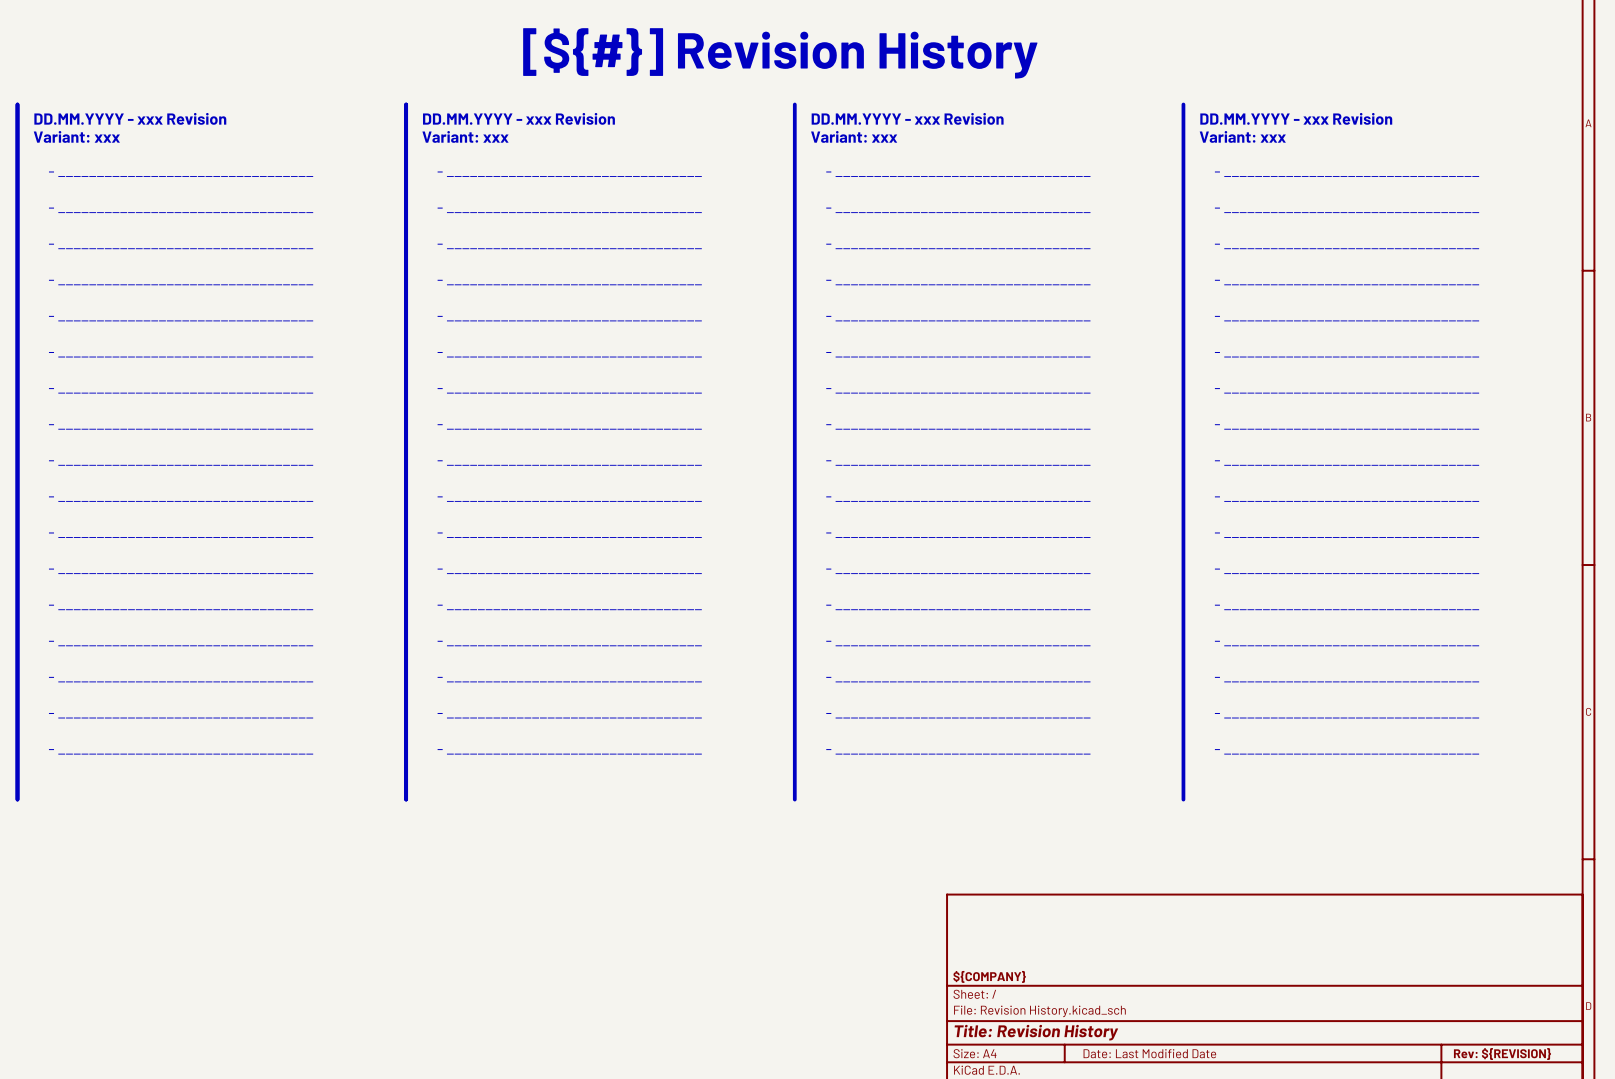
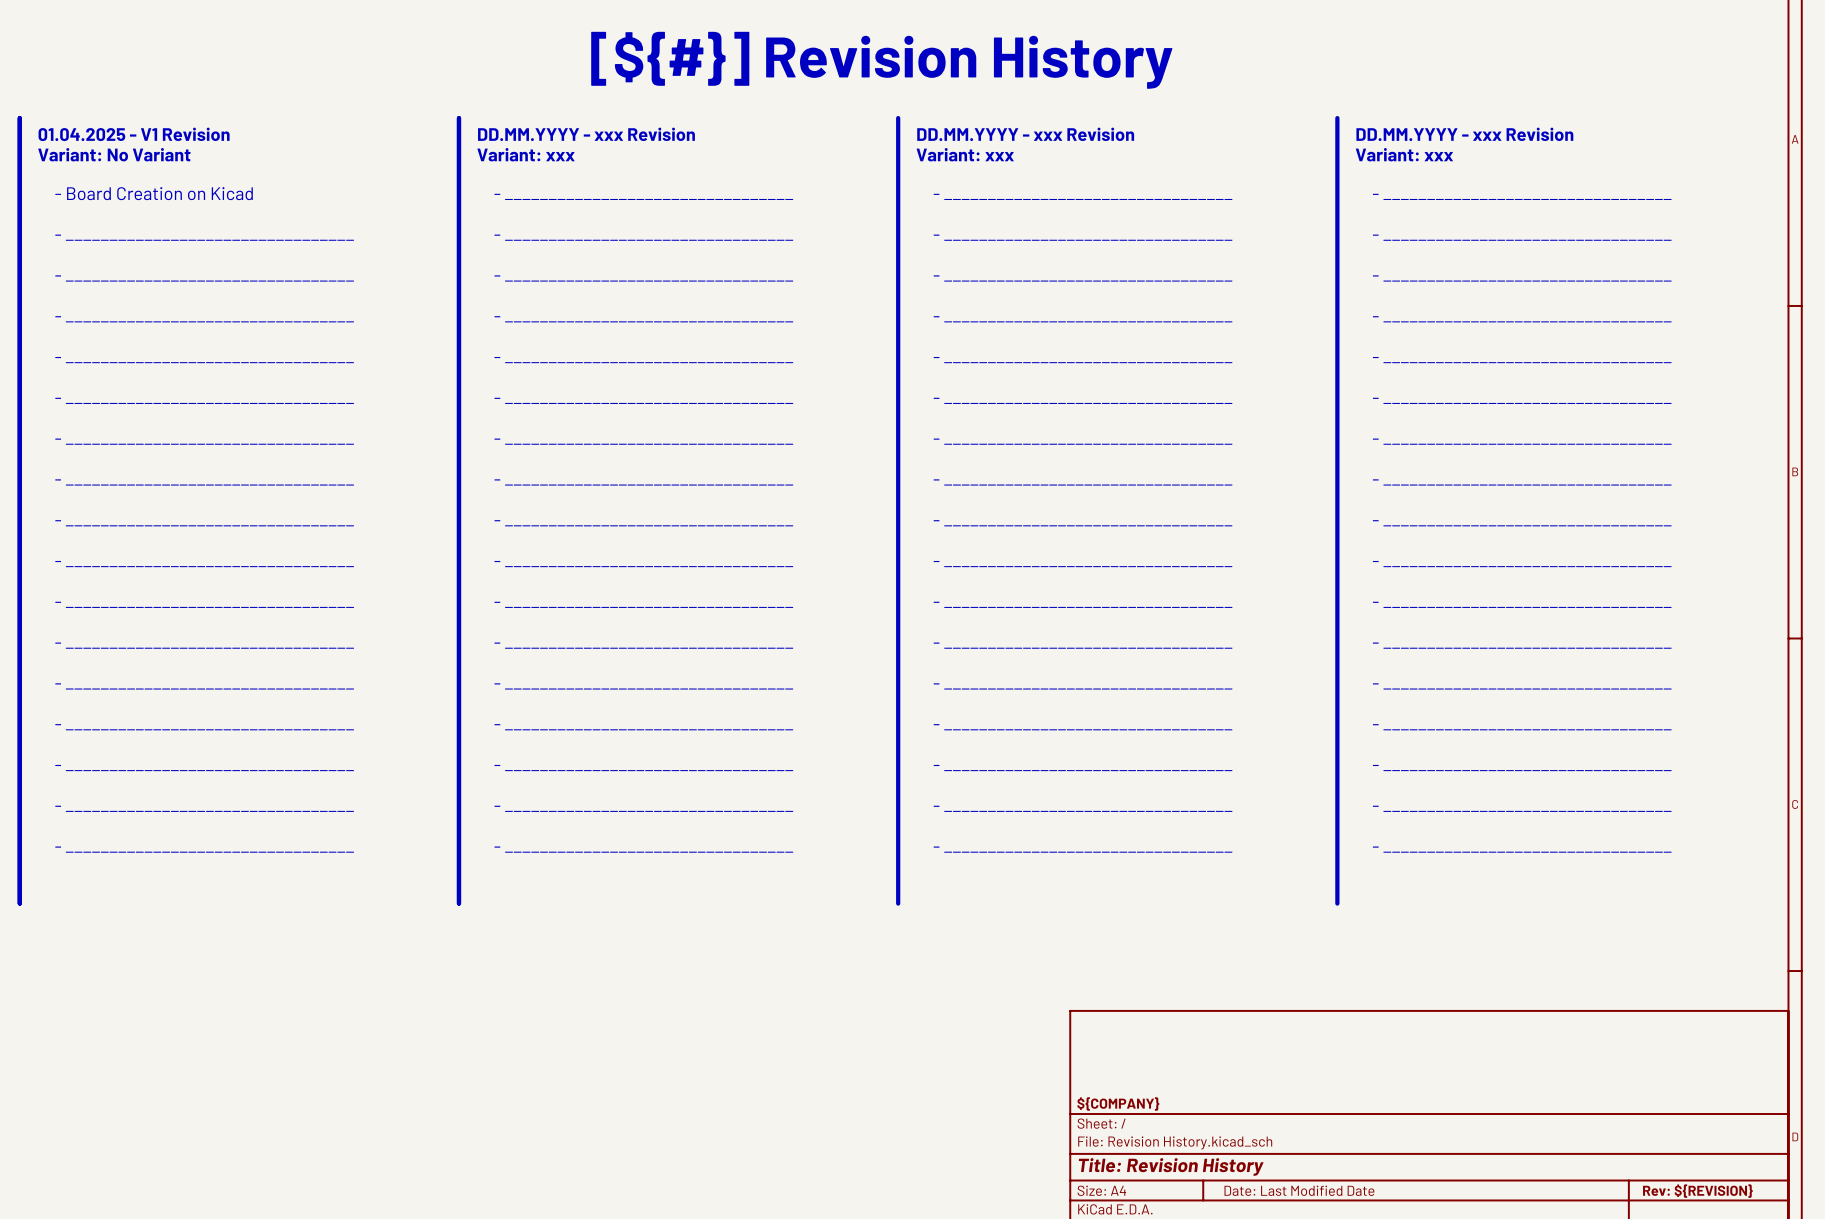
text: DD.MM.YYYY - xxx Revision (130, 118) -> 01.04.2025 - V1 Revision (134, 134)
text: Variant: xxx (76, 136) -> Variant: No Variant (114, 154)
text: - _________________________________ (181, 174) -> - Board Creation on Kicad (154, 193)

